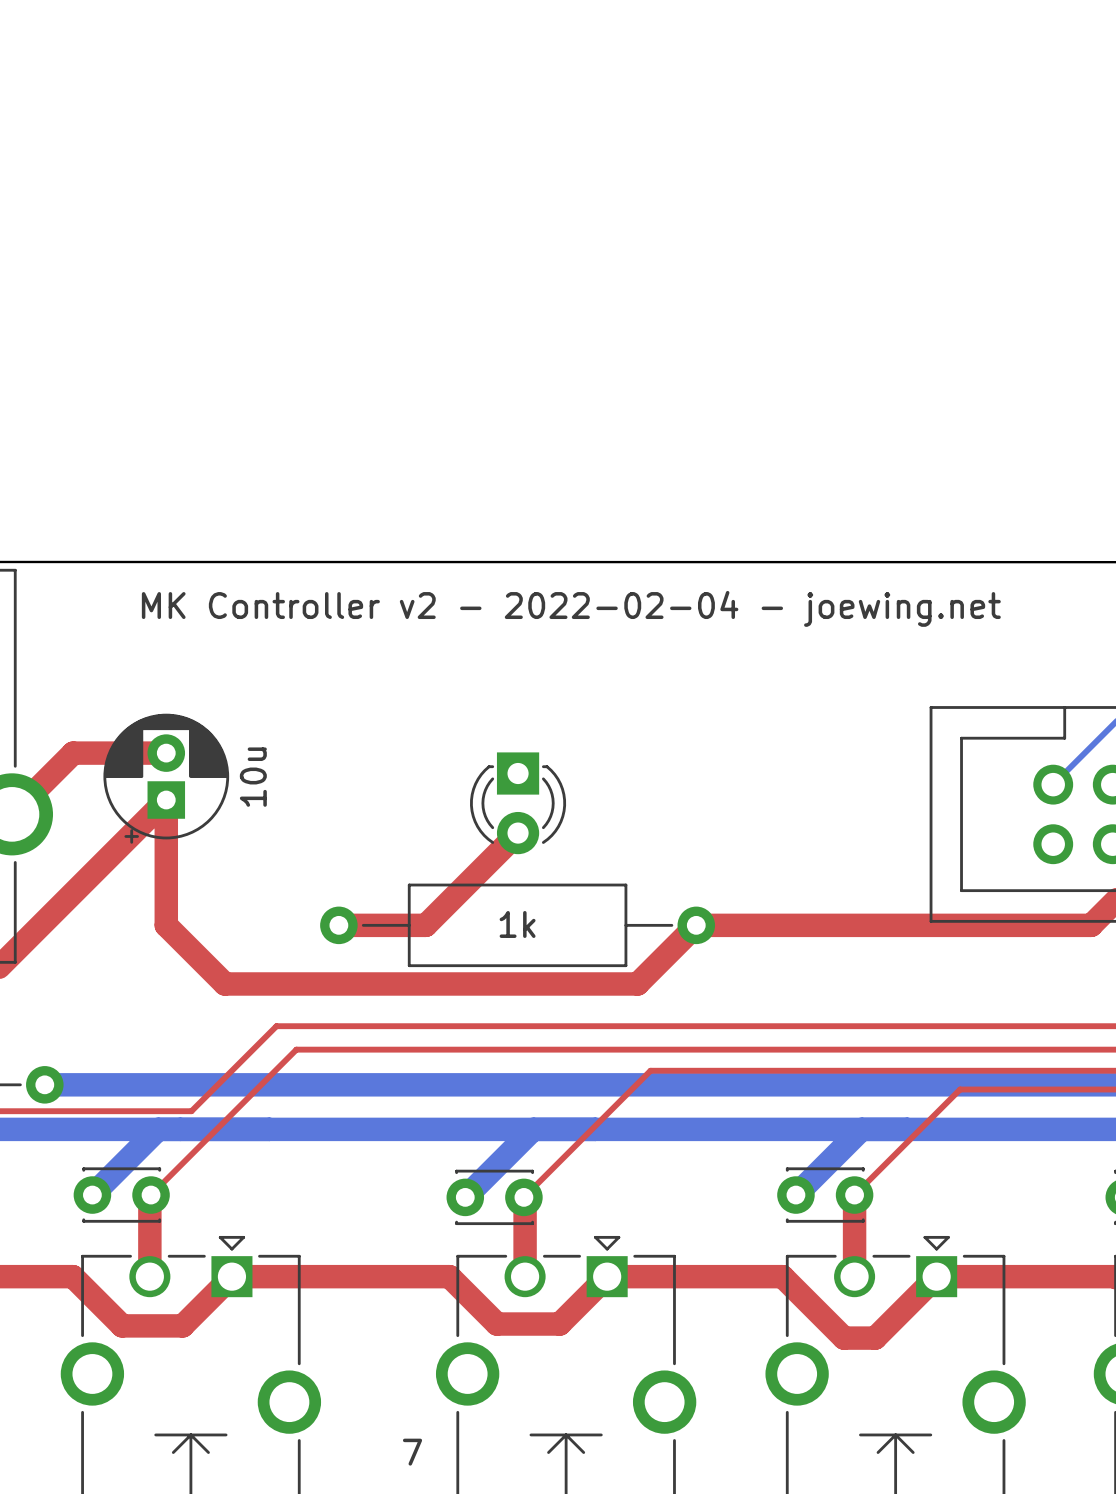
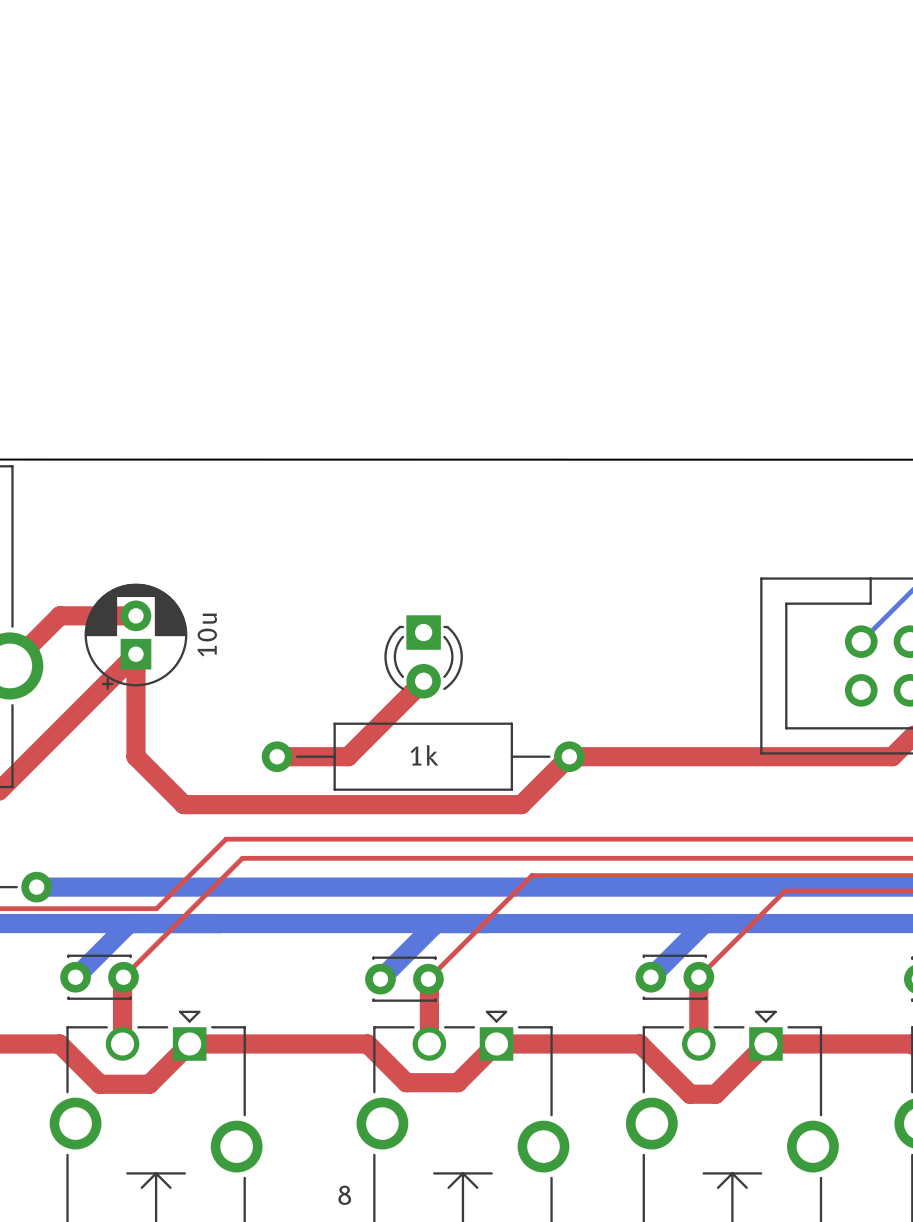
text: MK Controller v2 - 2022-02-04 - joewing.net (571, 608) -> none
text: 7 (412, 1452) -> 8 (344, 1195)

